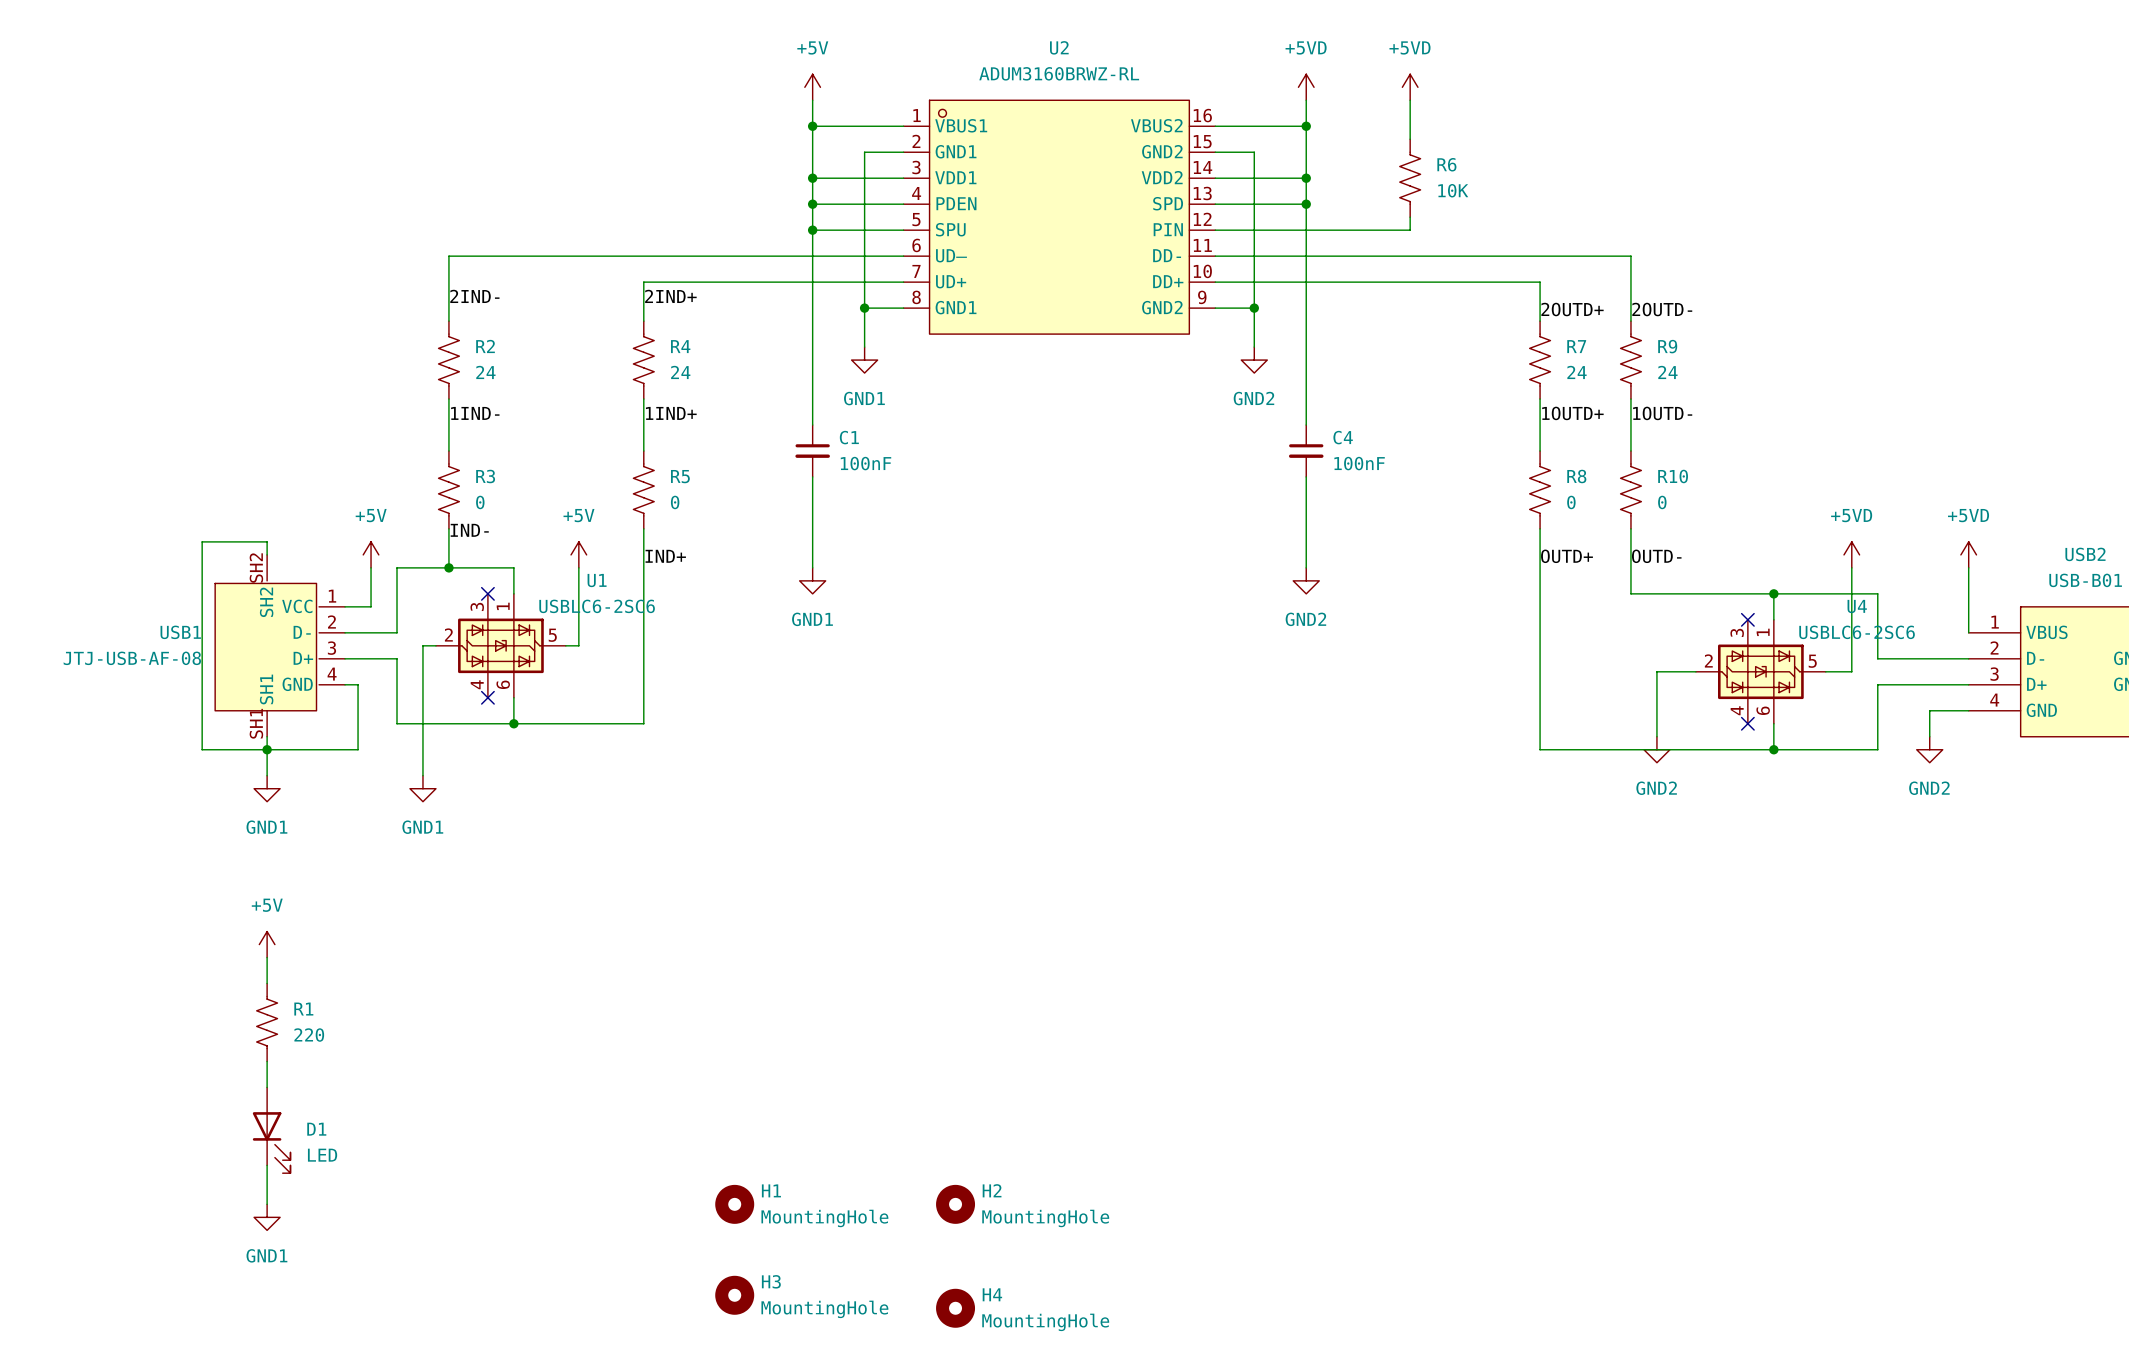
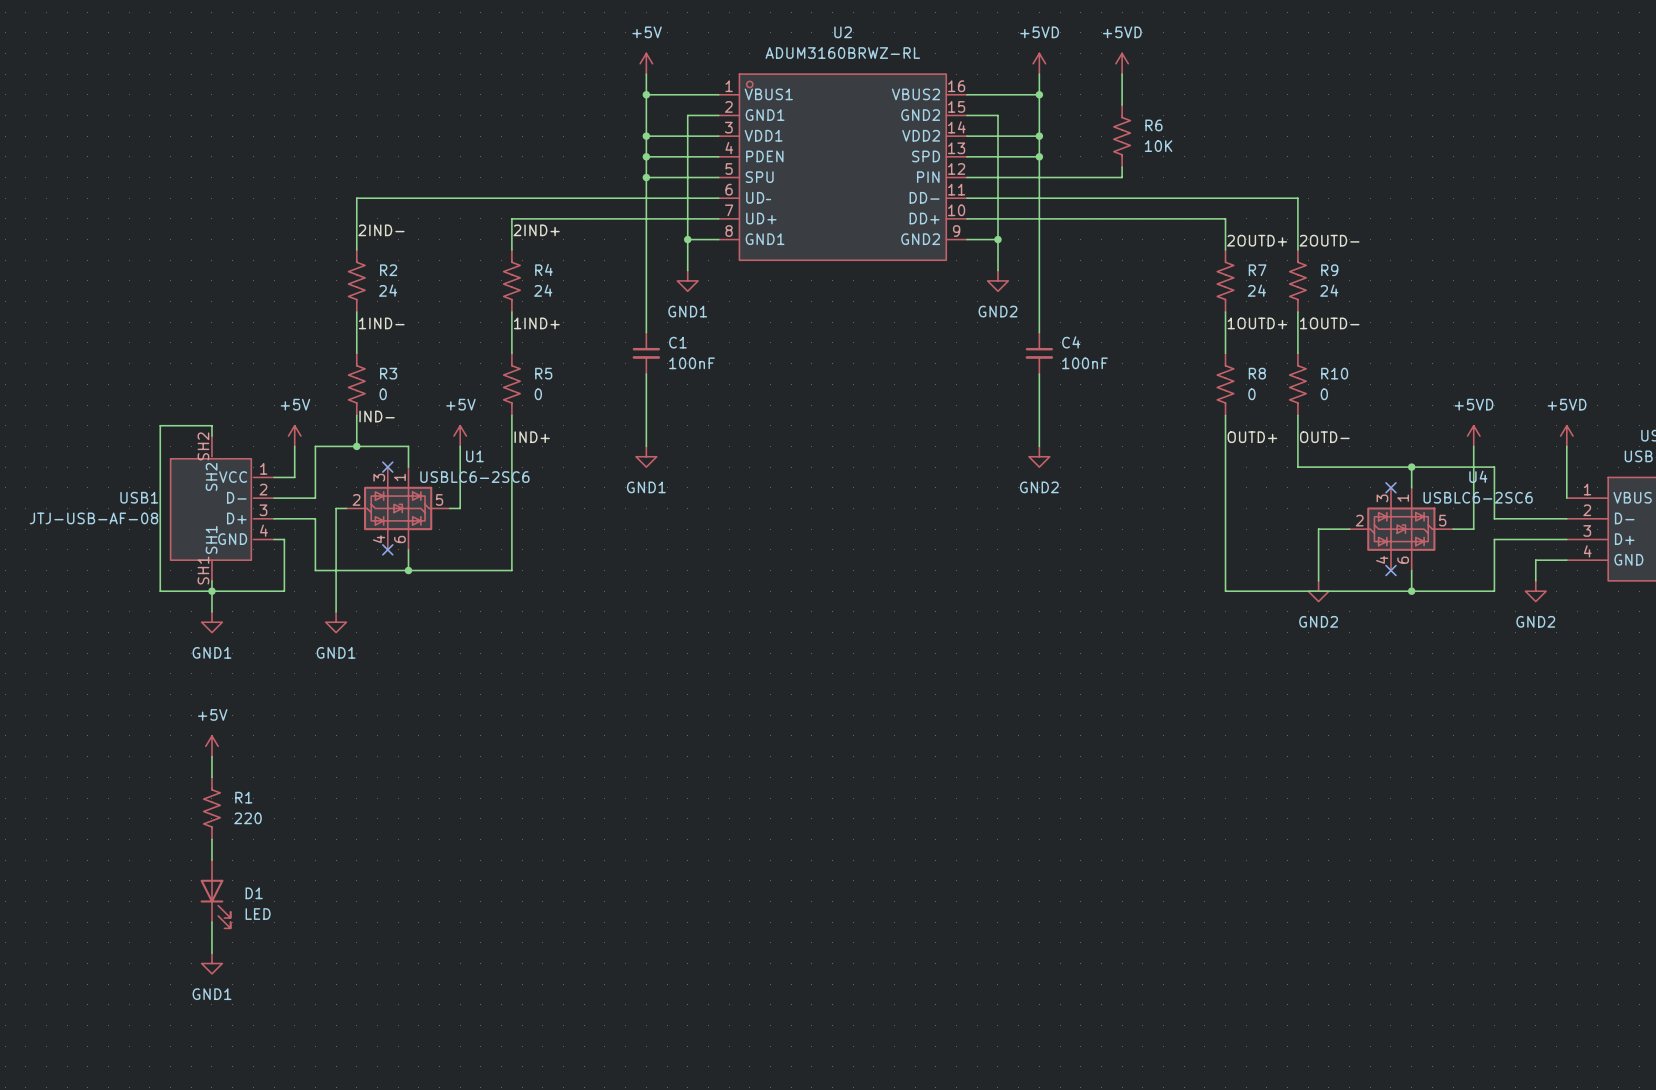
H1: MountingHole (734, 1204) -> none
H2: MountingHole (955, 1204) -> none
H3: MountingHole (734, 1295) -> none
H4: MountingHole (955, 1308) -> none

